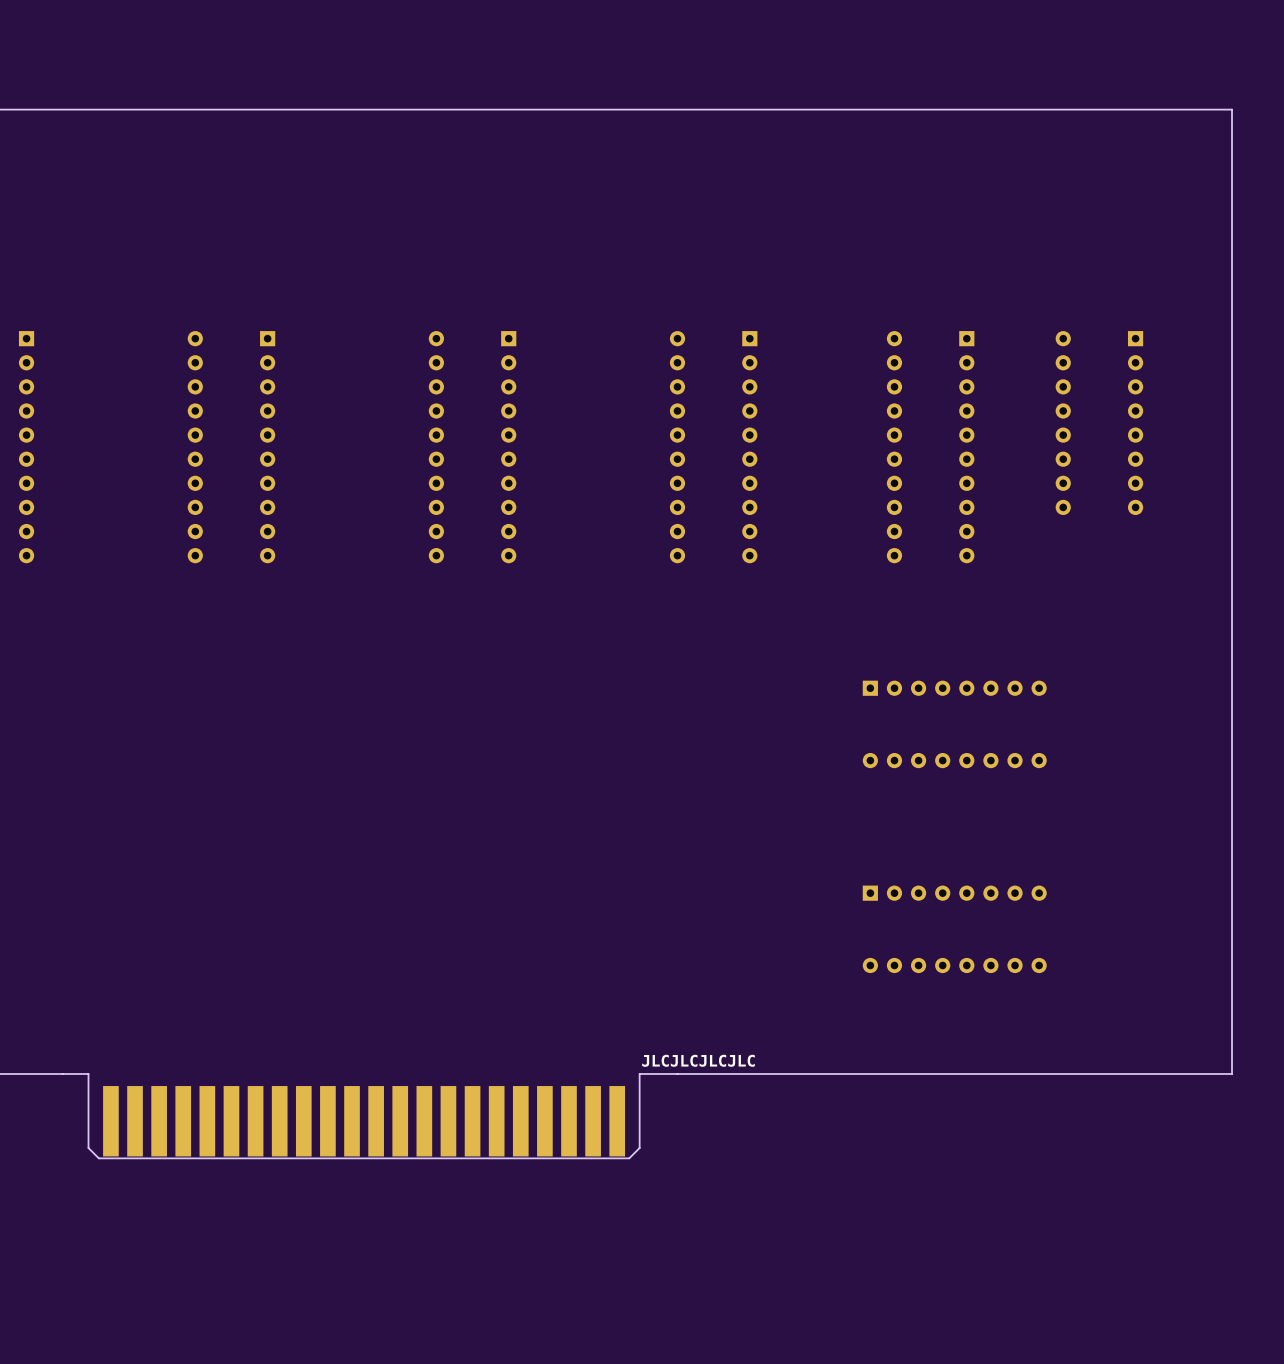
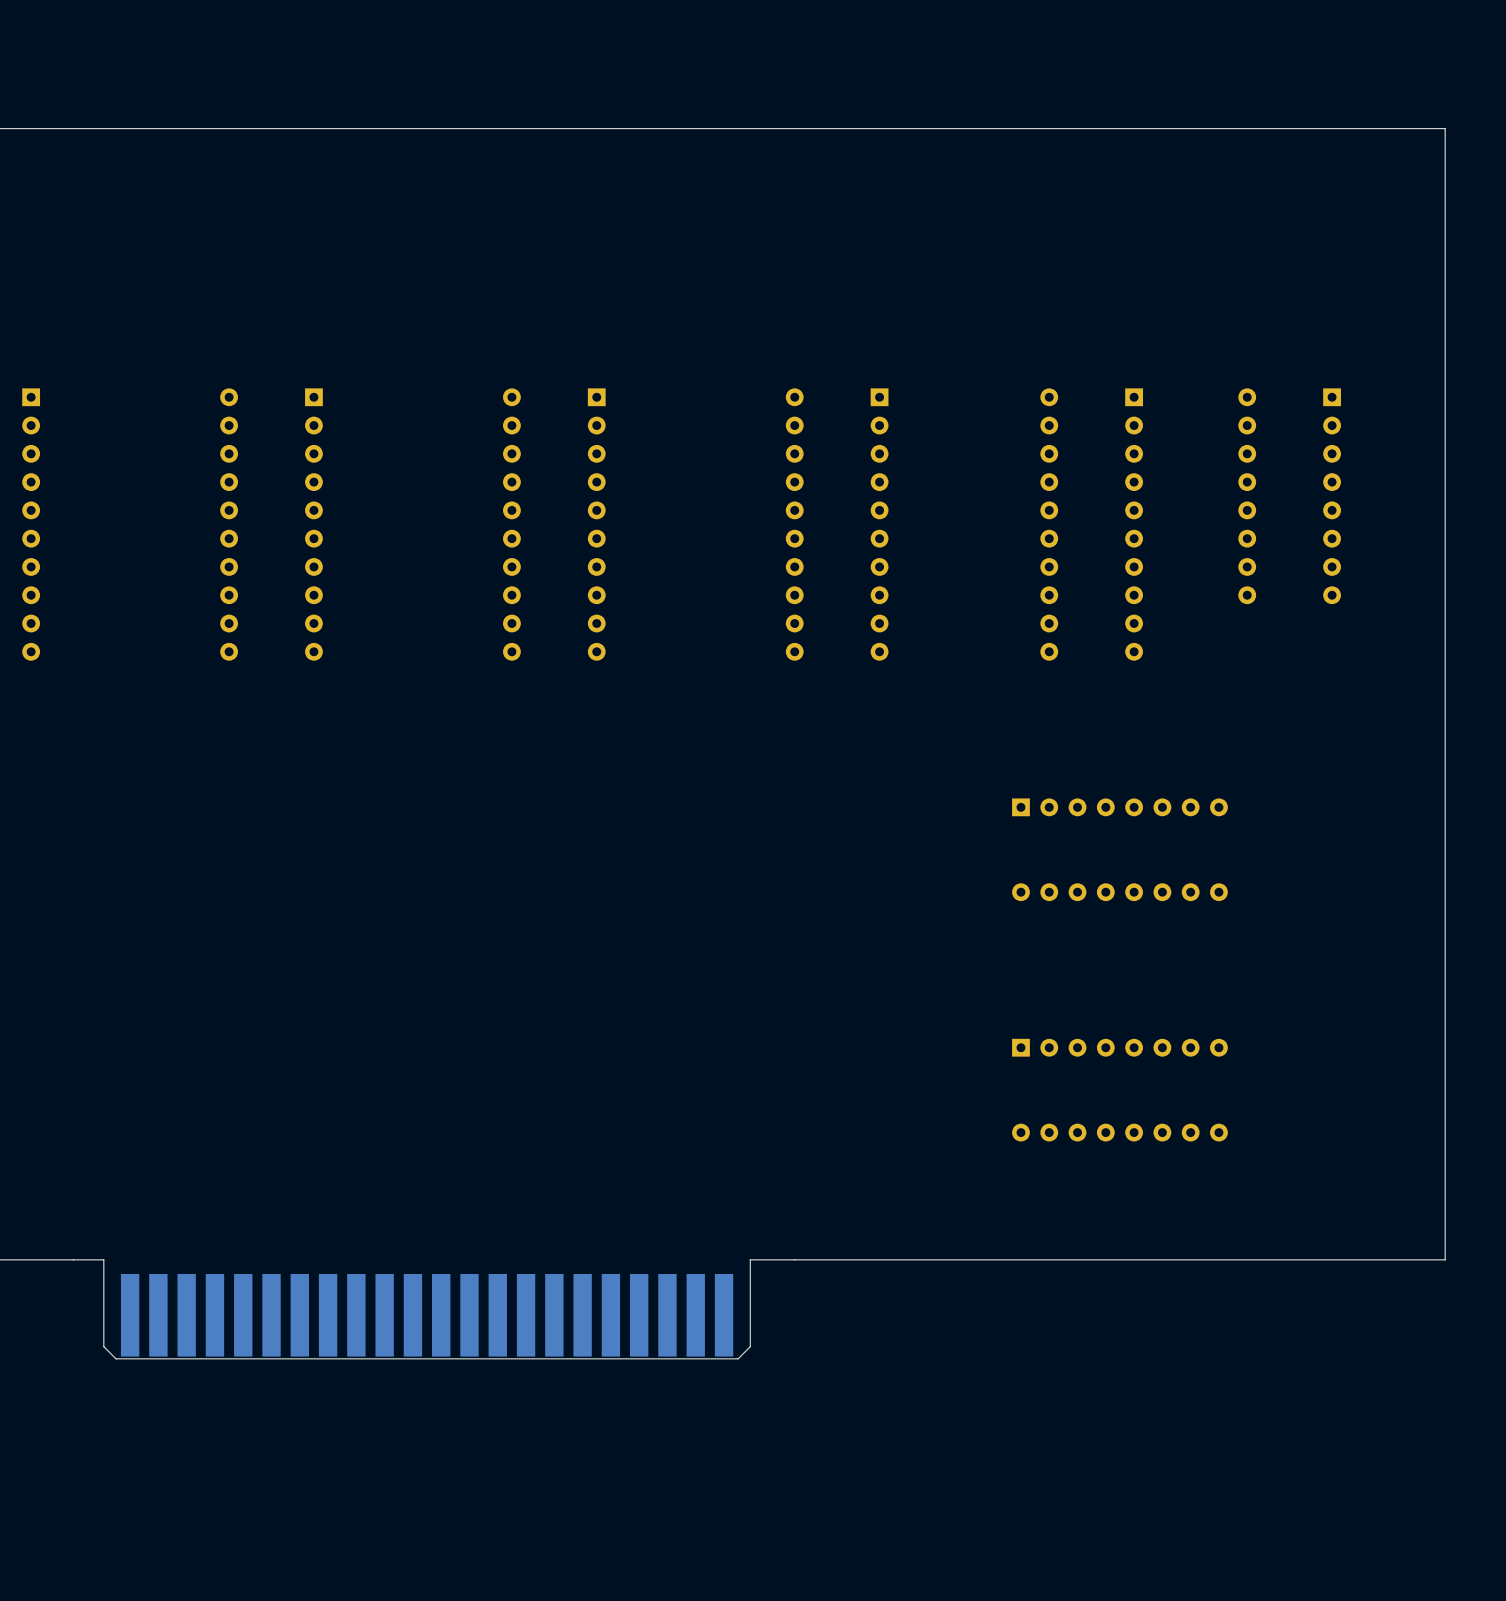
text: JLCJLCJLCJLC (698, 1060) -> none

